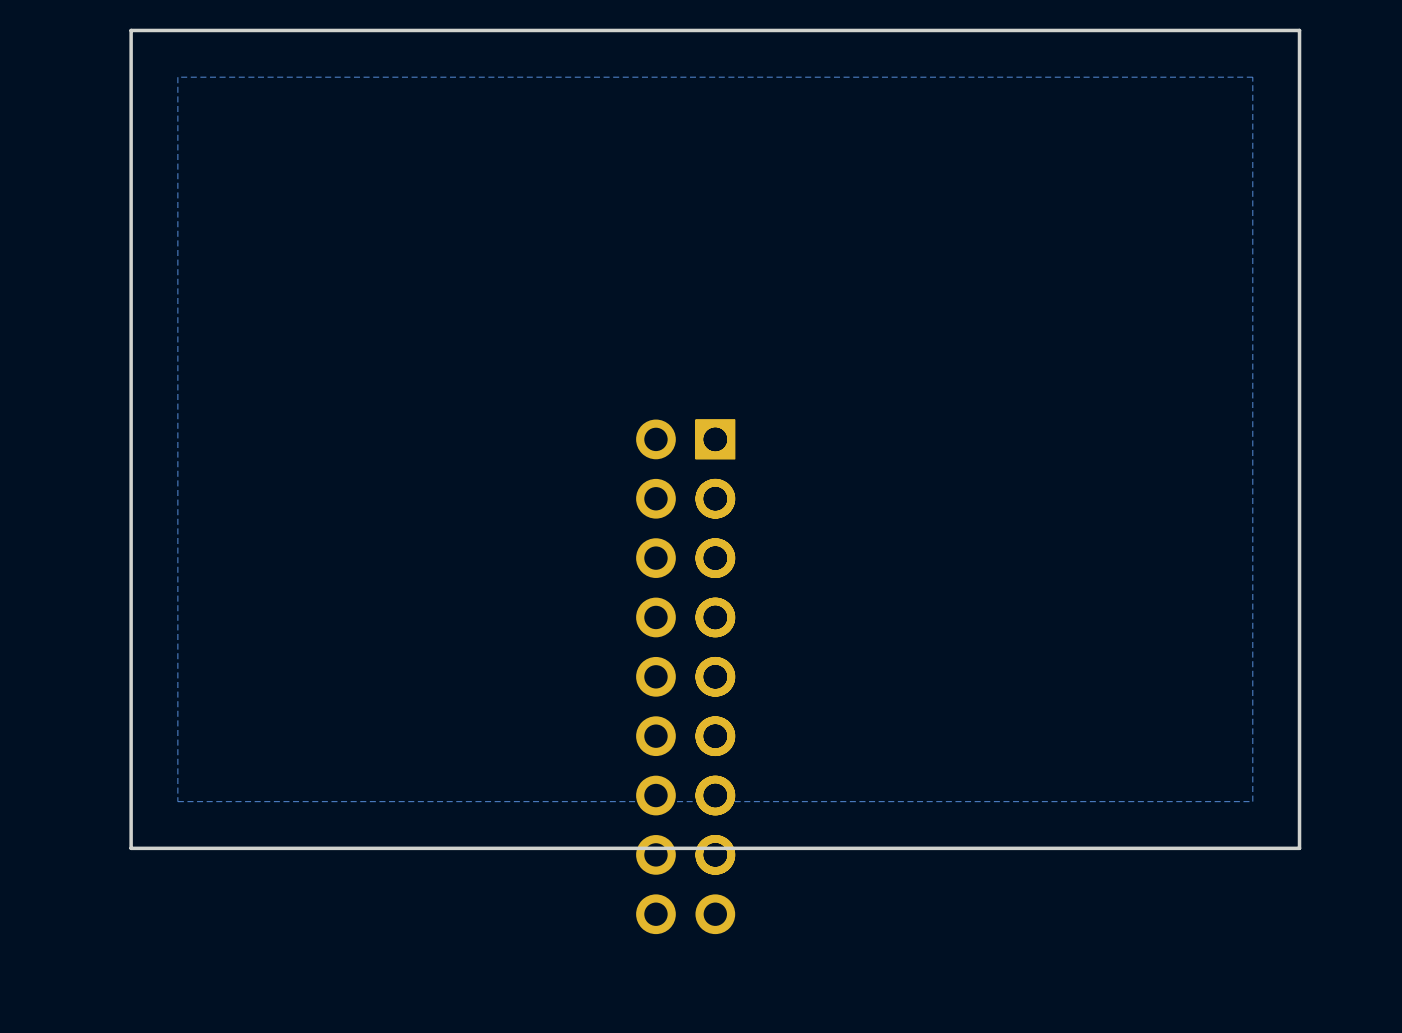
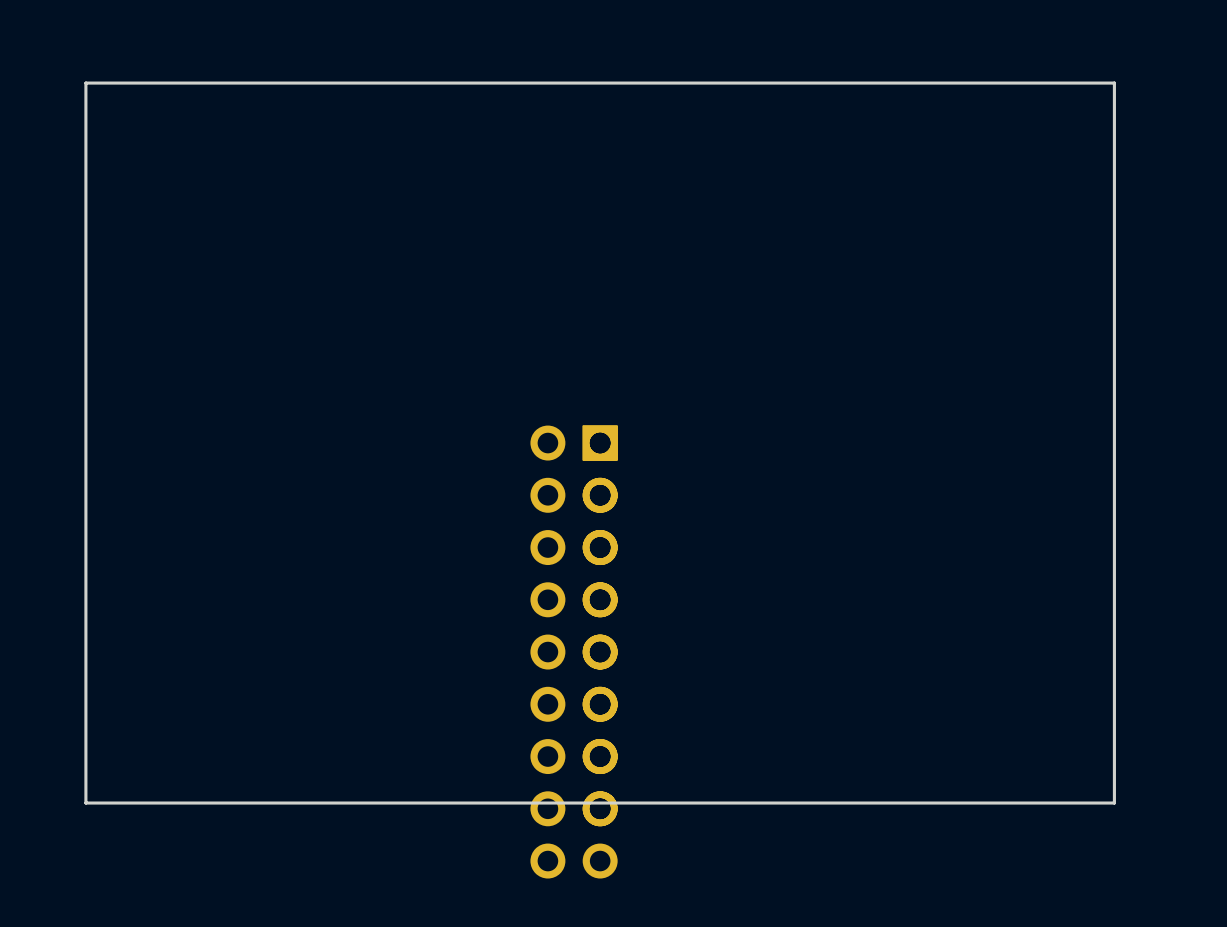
zone outline: (1252, 77) (177, 77) (177, 801) (1252, 801) (1252, 77) -> none

